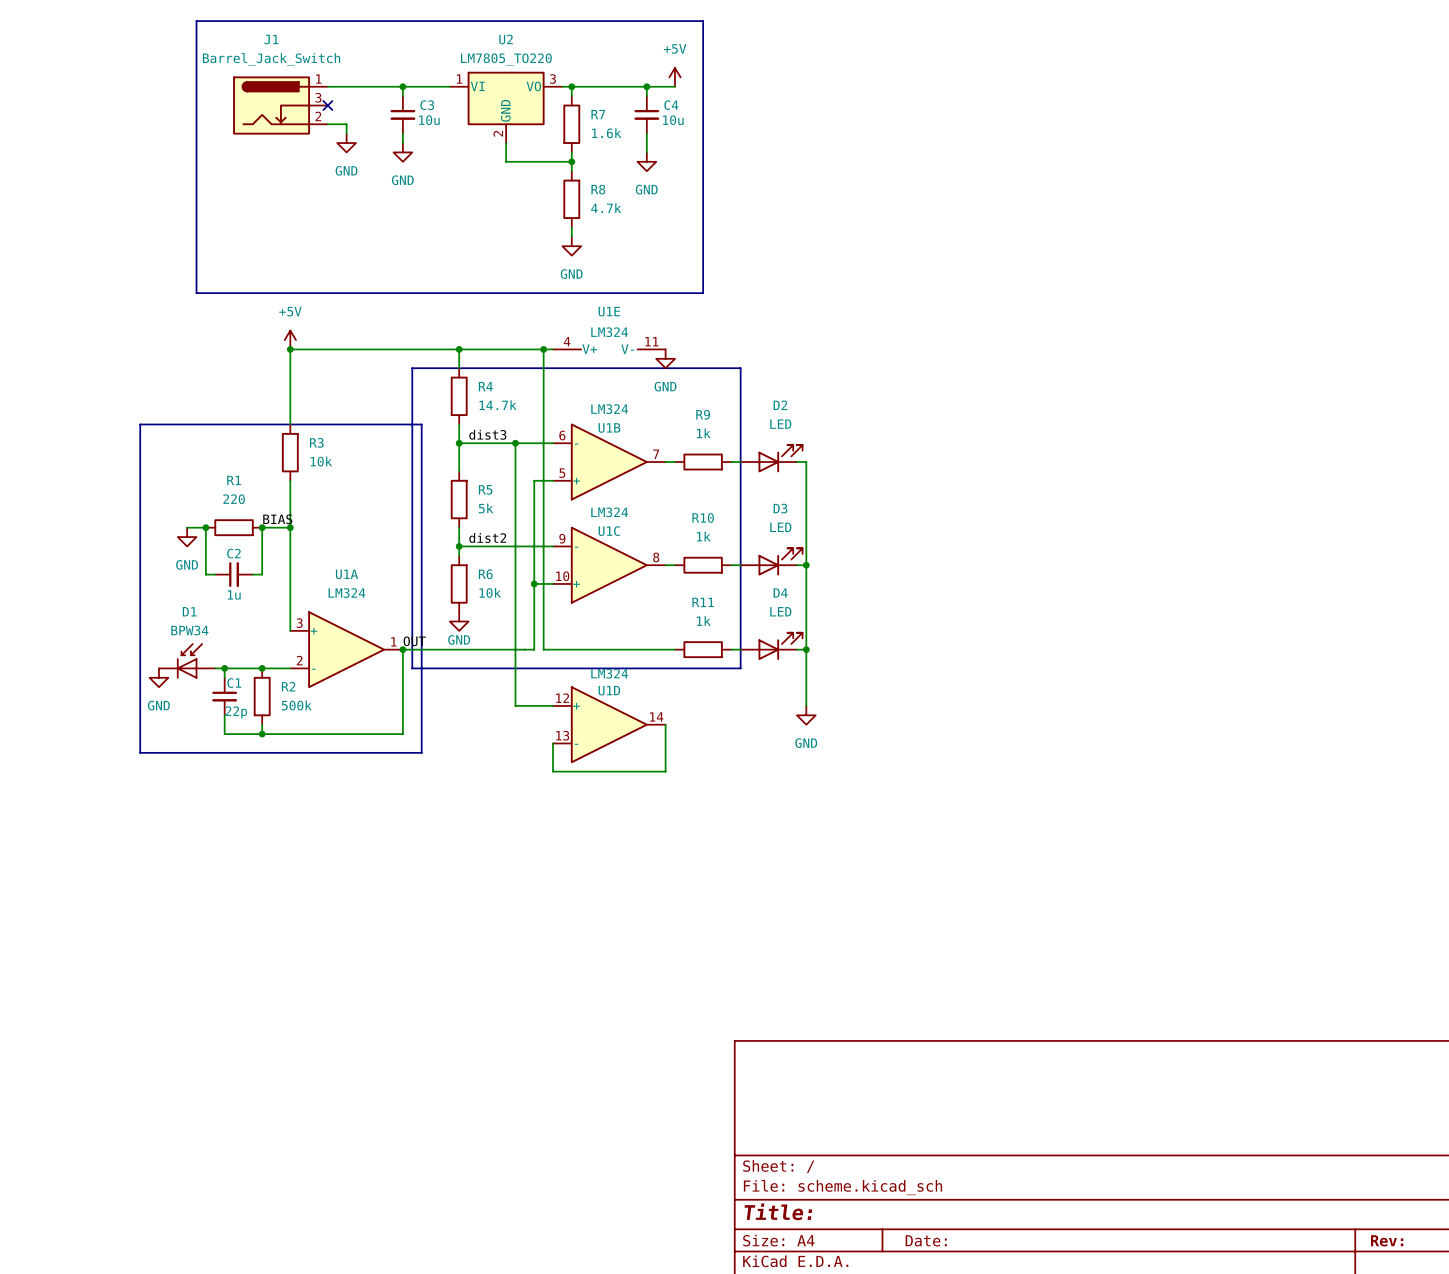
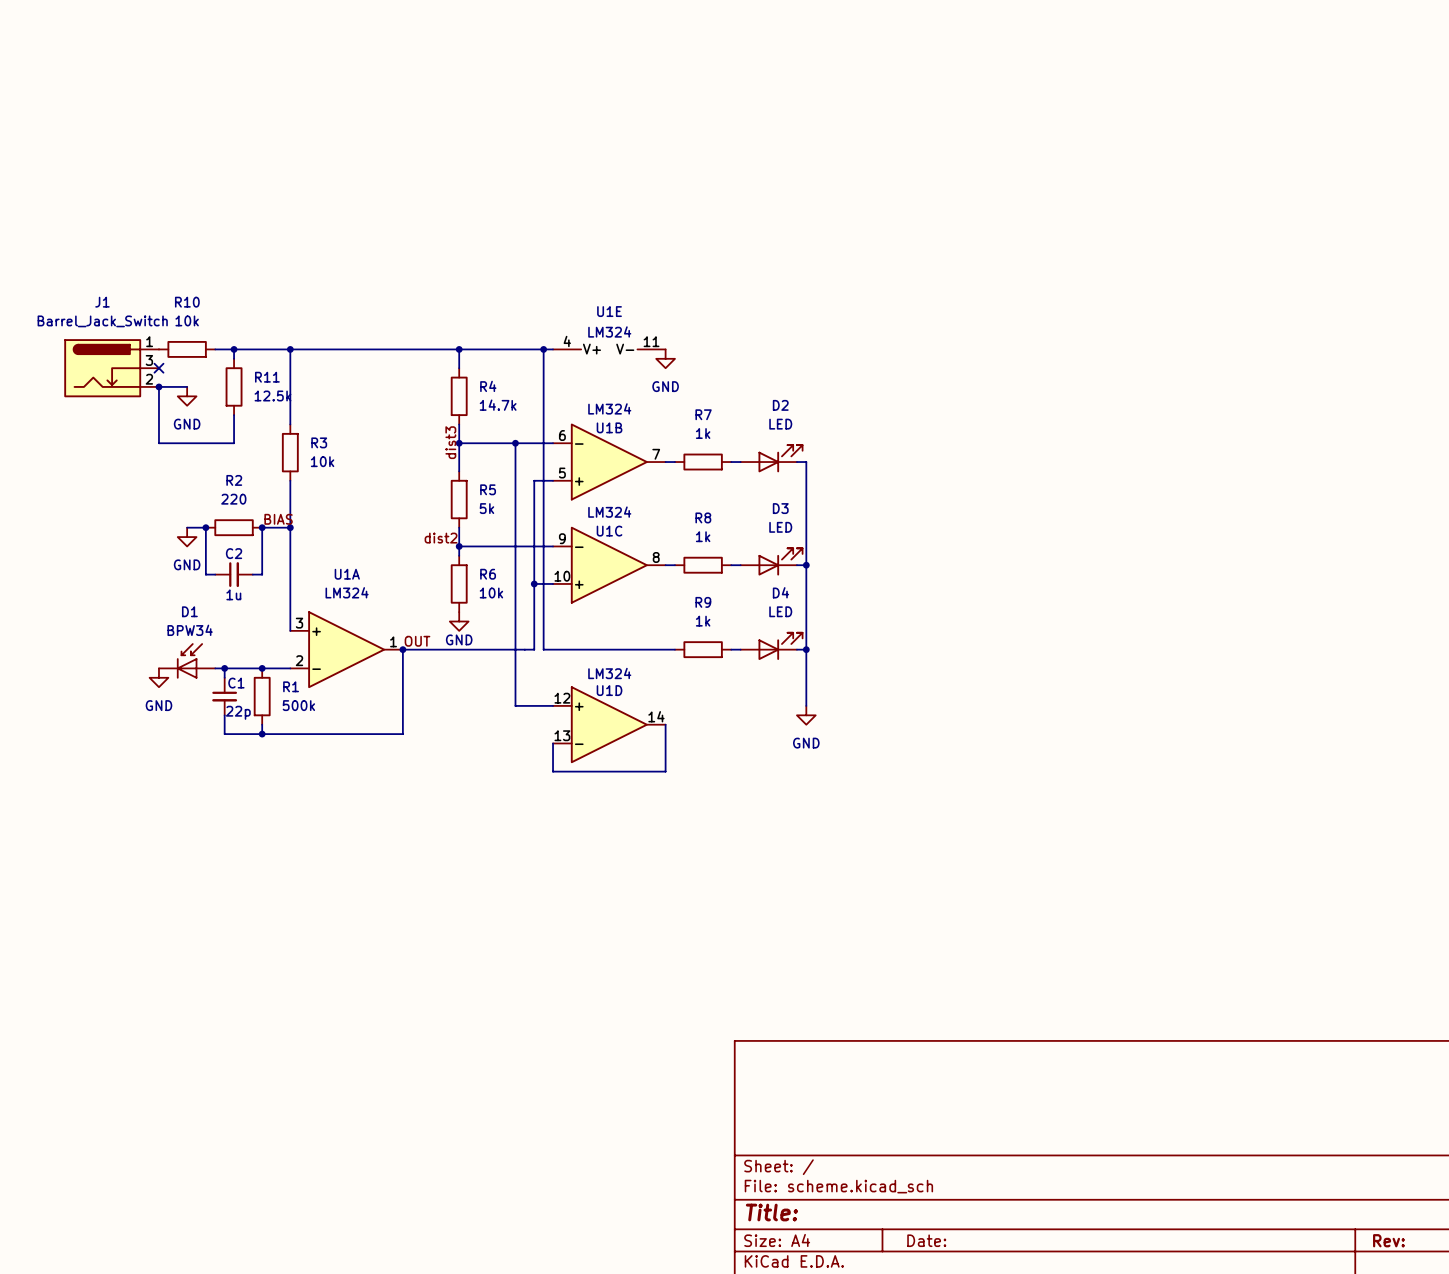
line: (196, 21) (703, 21) (703, 293) (196, 293) (196, 21) -> none
power symbol: +5V (674, 77) -> none
wire: (327, 86) (449, 86) -> none
wire: (402, 86) (402, 96) -> none
junction: (402, 86) -> none
wire: (562, 86) (674, 86) -> none
wire: (571, 86) (571, 96) -> none
junction: (571, 86) -> none
wire: (646, 86) (646, 96) -> none
junction: (646, 86) -> none
J1 position: (280, 105) -> (111, 368)
no-connect mark: (327, 105) -> none
U2: LM7805_TO220 (506, 107) -> none
C3: 10u (402, 114) -> none
C4: 10u (646, 114) -> none
wire: (327, 124) (346, 124) (346, 133) -> none
R7: 1.6k (571, 124) -> none
wire: (402, 133) (402, 143) -> none
wire: (646, 133) (646, 152) -> none
power symbol: GND (346, 143) -> none
wire: (506, 143) (506, 161) (571, 161) -> none
power symbol: GND (402, 152) -> none
wire: (571, 152) (571, 171) -> none
junction: (571, 161) -> none
power symbol: GND (646, 161) -> none
R8: 4.7k (571, 199) -> none
wire: (571, 227) (571, 236) -> none
power symbol: GND (571, 246) -> none
power symbol: +5V (290, 340) -> none
R10: none -> 10k (187, 349)
wire: none -> (215, 349) (290, 349)
wire: none -> (234, 349) (234, 358)
junction: none -> (234, 349)
no-connect mark: none -> (158, 368)
line: (412, 368) (740, 368) (740, 668) (412, 668) (412, 368) -> none
junction: none -> (158, 386)
wire: none -> (187, 386) (158, 386) (158, 443) (234, 443) (234, 415)
R11: none -> 12.5k (234, 386)
power symbol: none -> GND (187, 396)
R9 name: R9 (703, 414) -> R7 (703, 414)
line: (140, 424) (421, 424) (421, 752) (140, 752) (140, 424) -> none
label rotation: 0° (487, 434) -> 90° counterclockwise (450, 442)
R1 name: R1 (234, 480) -> R2 (234, 480)
R10 name: R10 (703, 517) -> R8 (703, 517)
label position: dist2 (487, 537) -> dist2 (441, 538)
R11 name: R11 (703, 602) -> R9 (703, 602)
R2 name: R2 (288, 686) -> R1 (291, 686)

